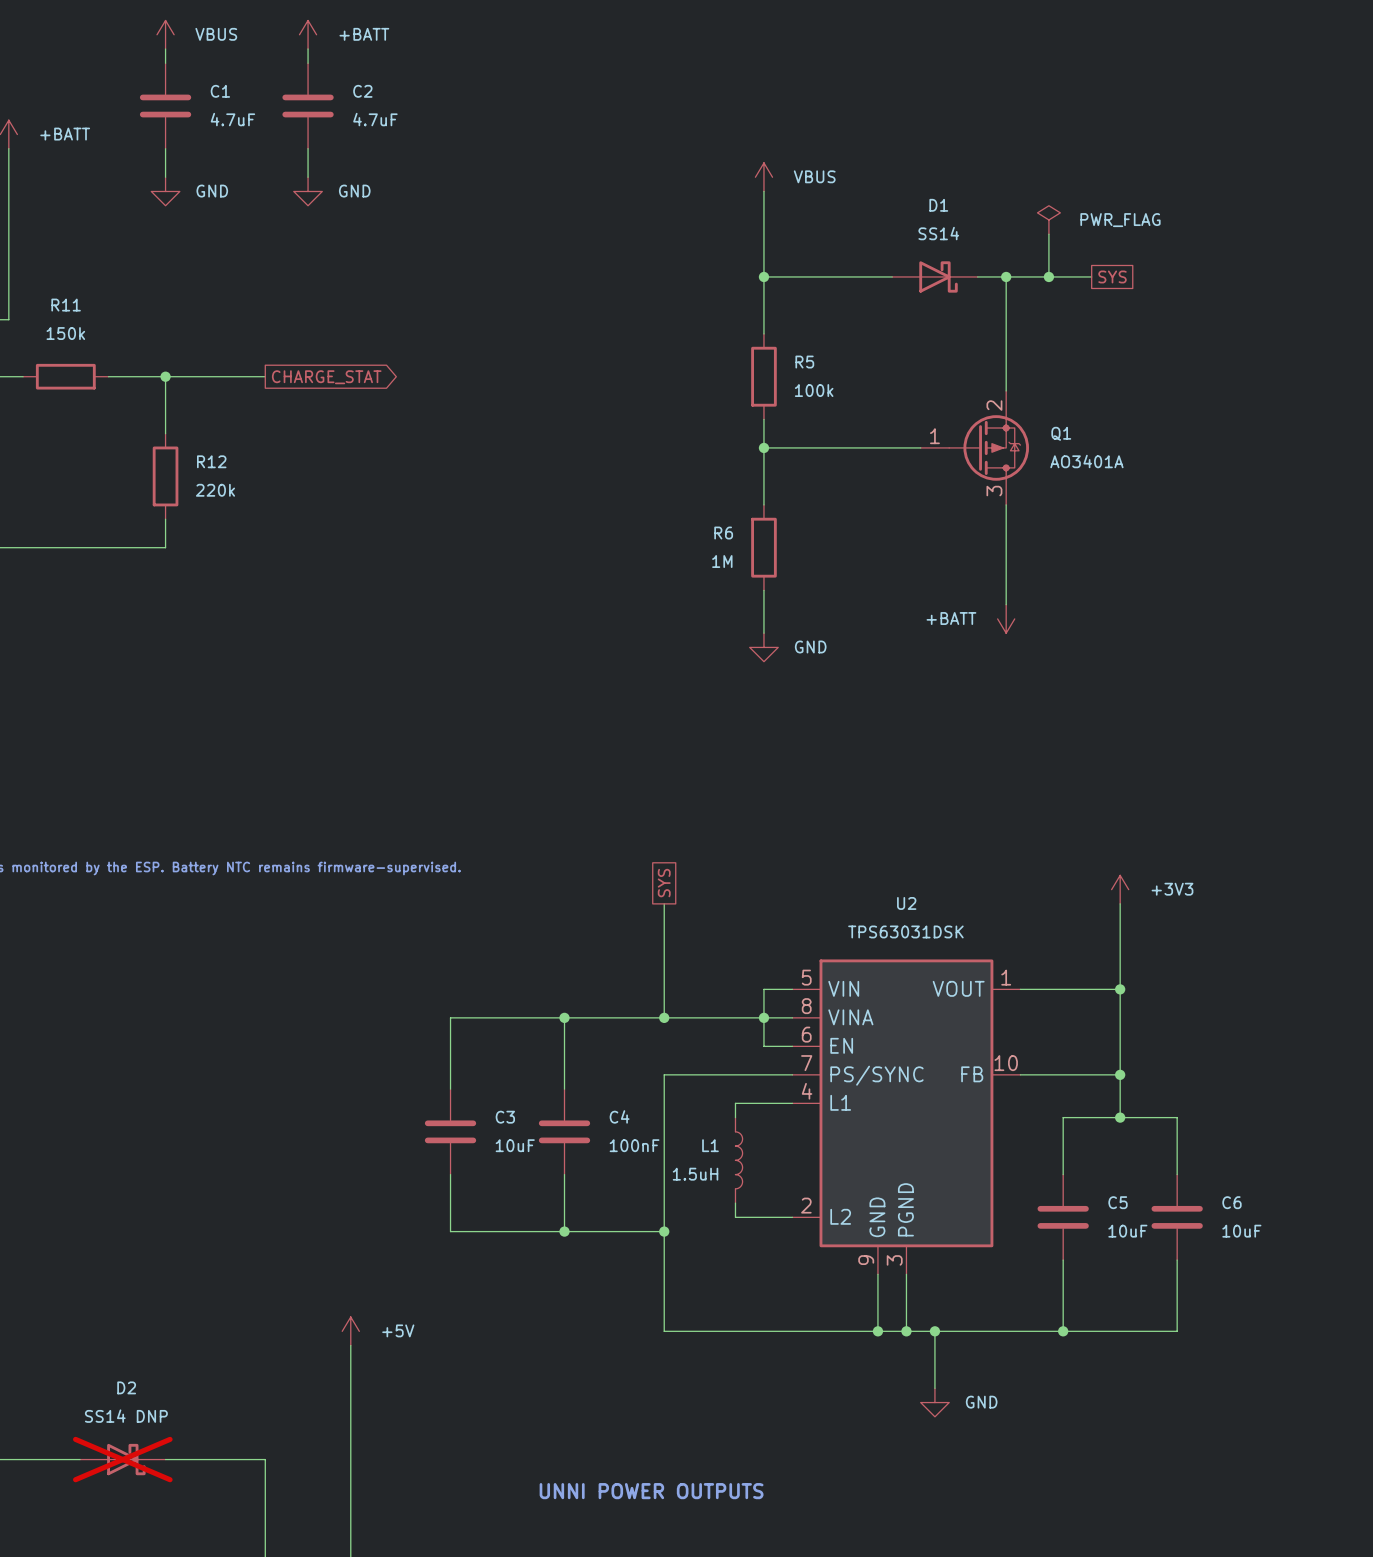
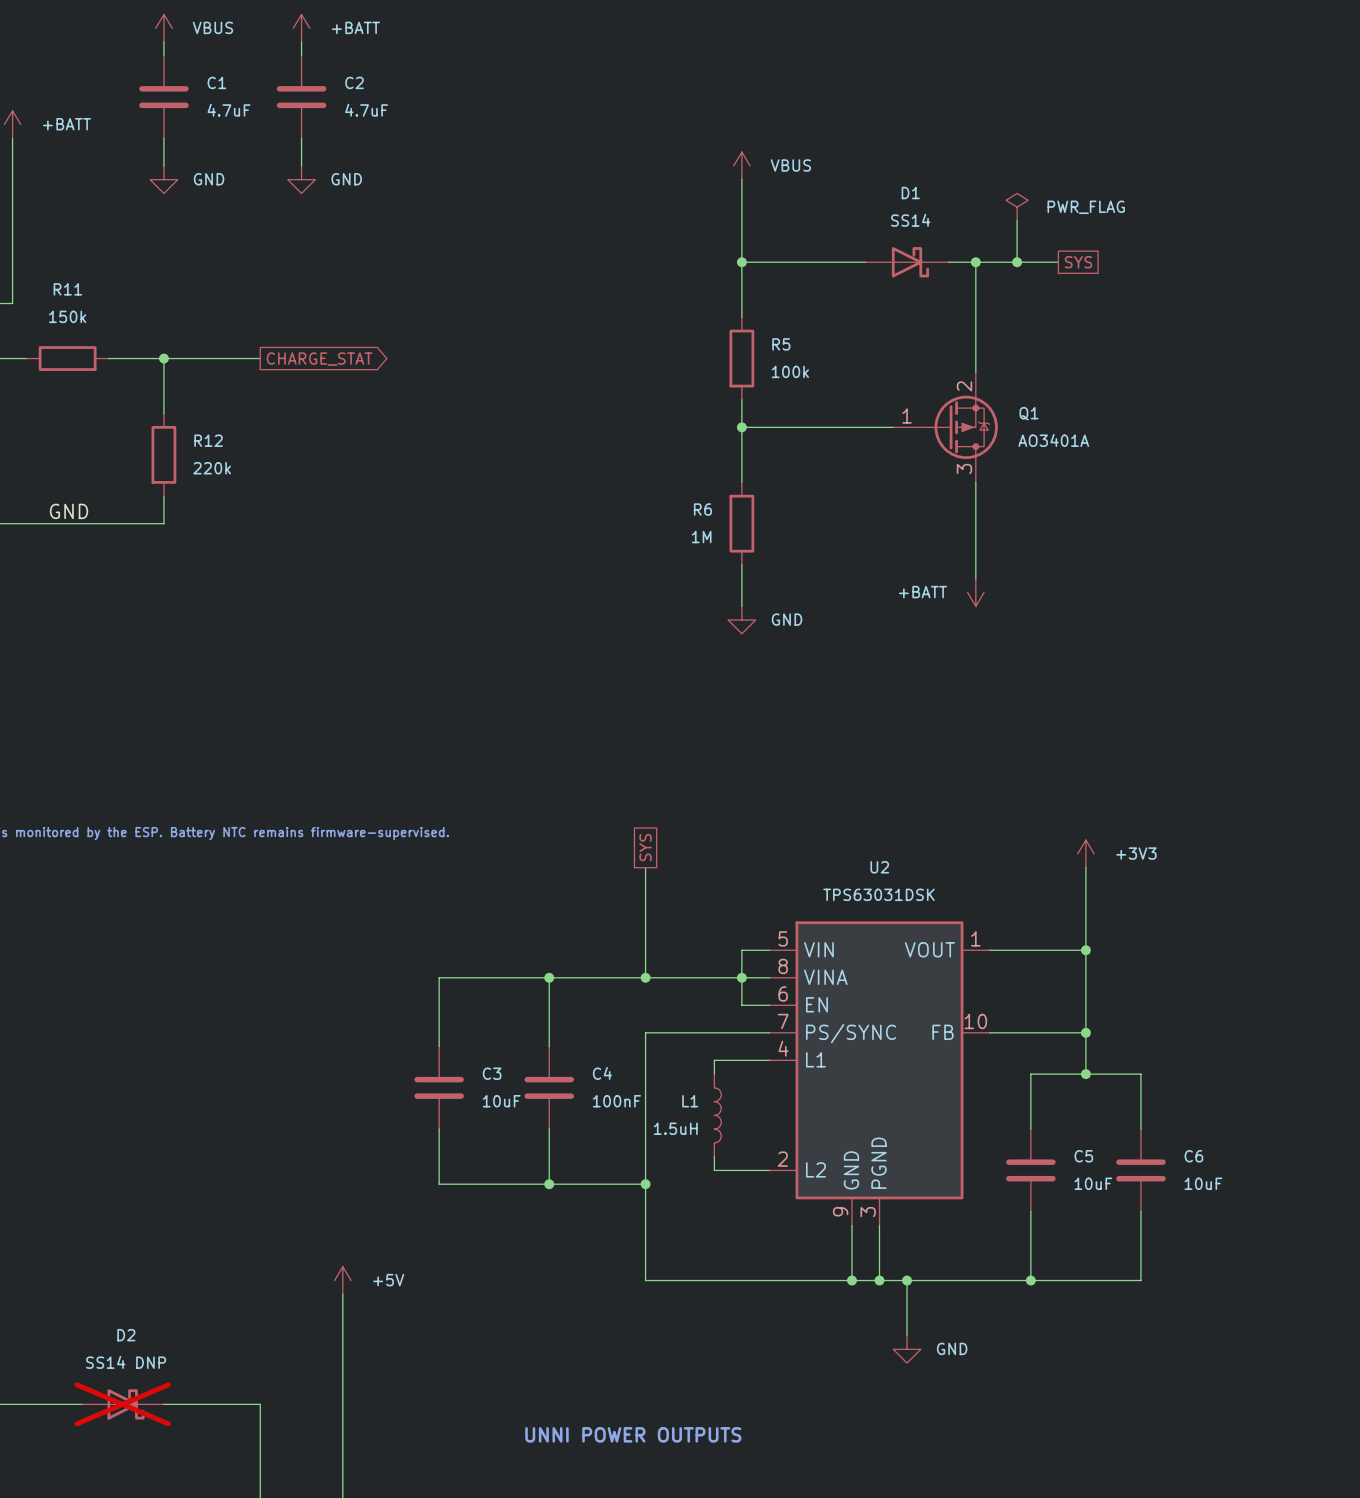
label: none -> GND (69, 511)

